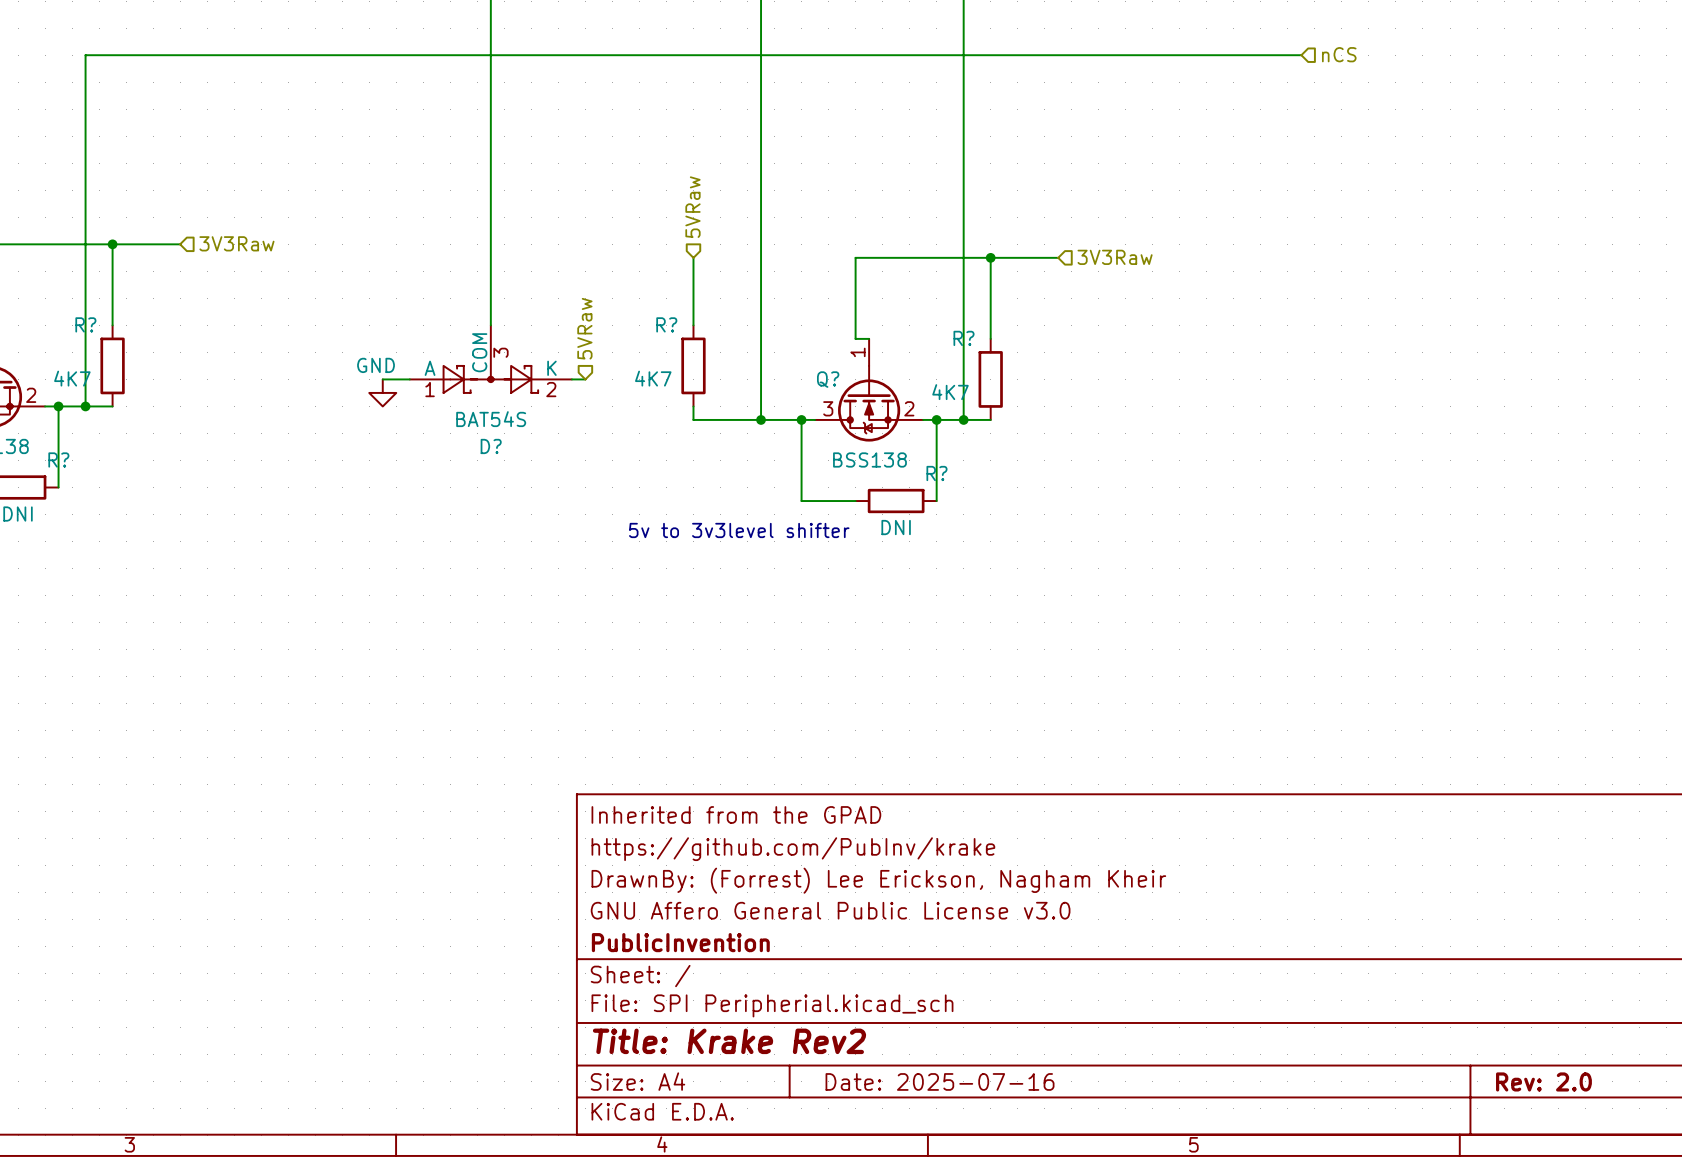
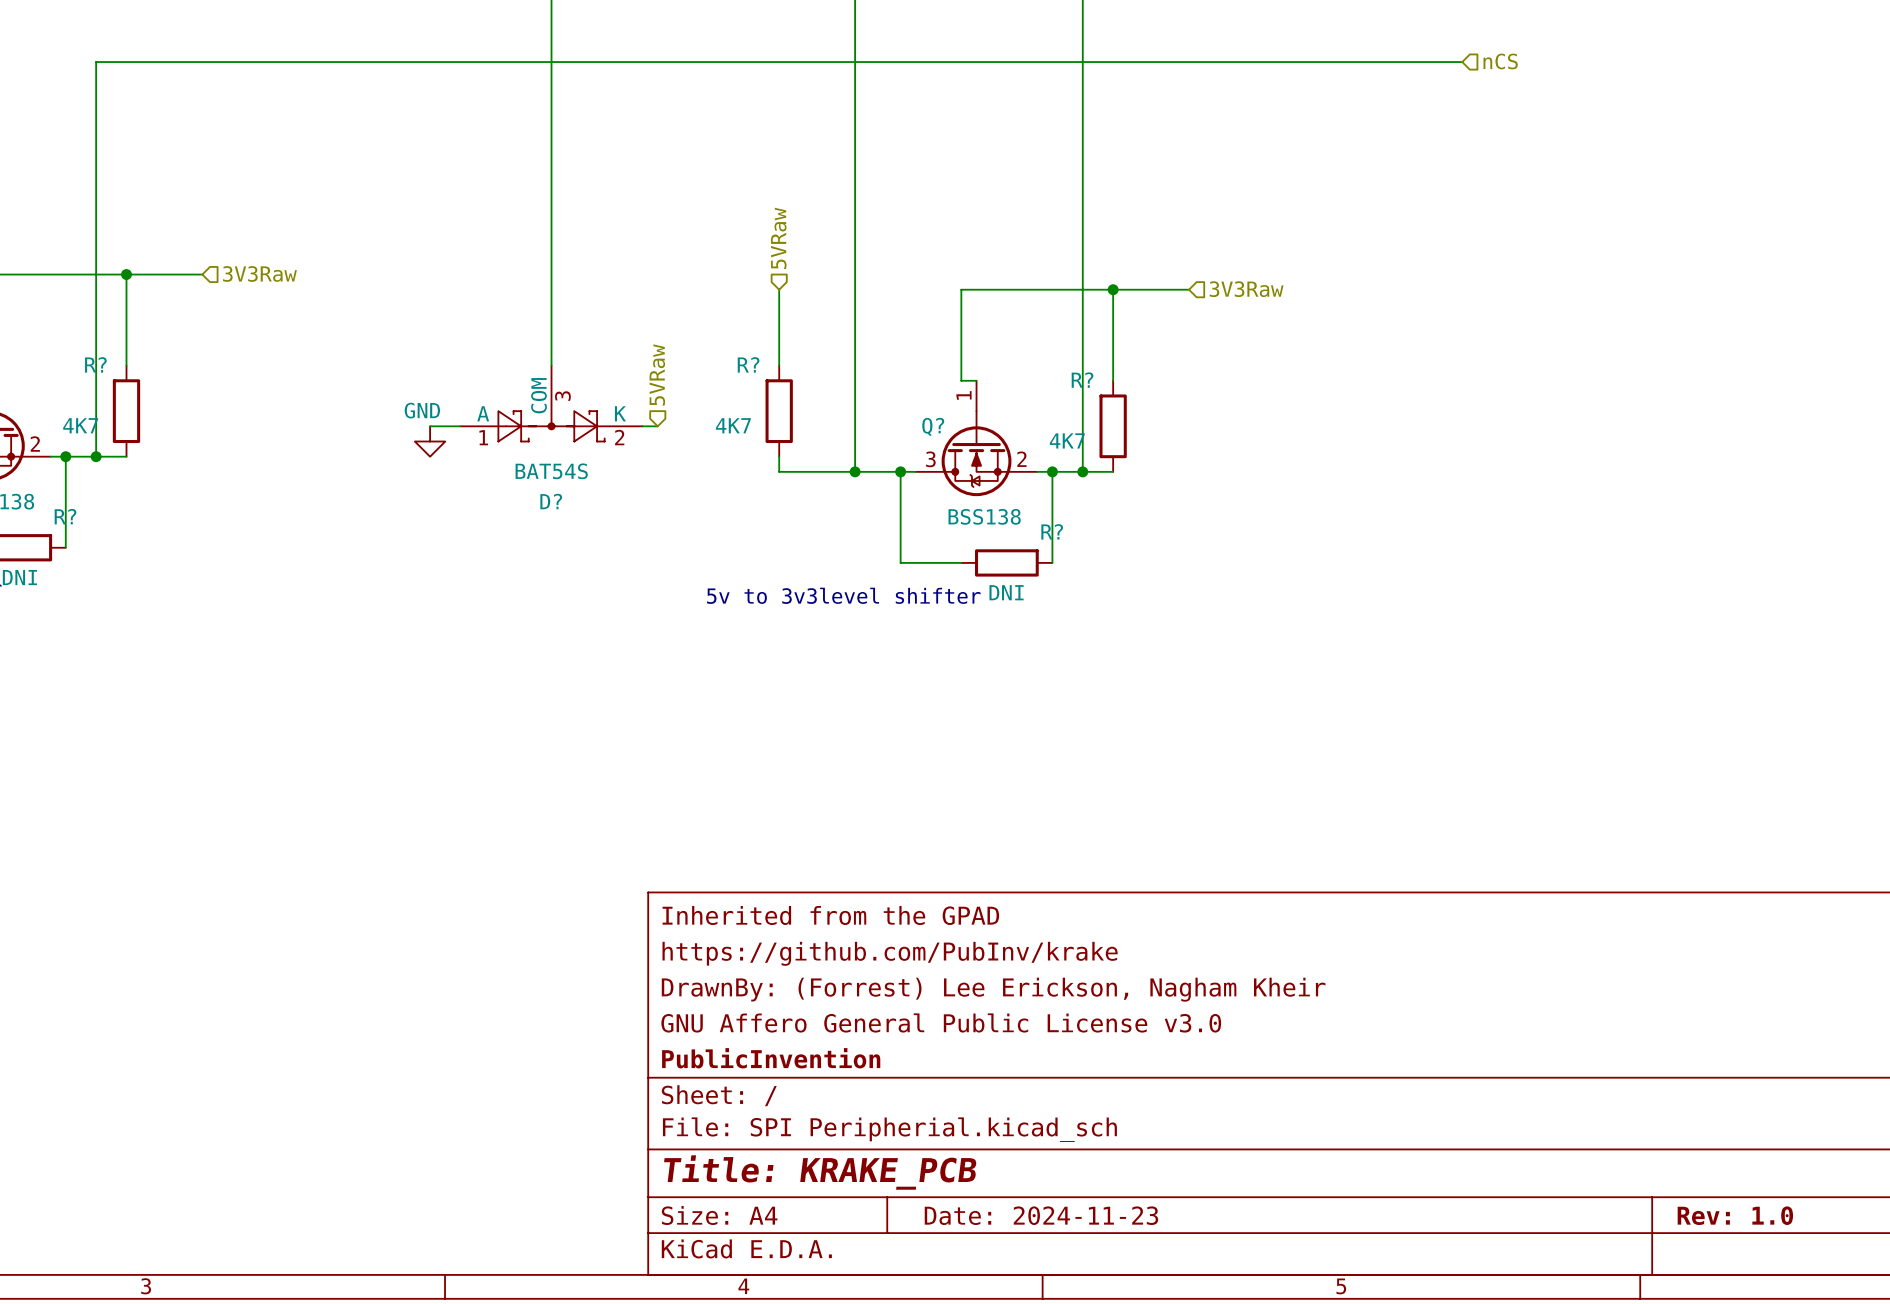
title block: Title: Krake Rev2 (729, 1041) -> Title: KRAKE_PCB (820, 1172)
title block: Date: 2025-07-16 (940, 1081) -> Date: 2024-11-23 (1041, 1215)
title block: Rev: 2.0 (1543, 1081) -> Rev: 1.0 (1735, 1215)

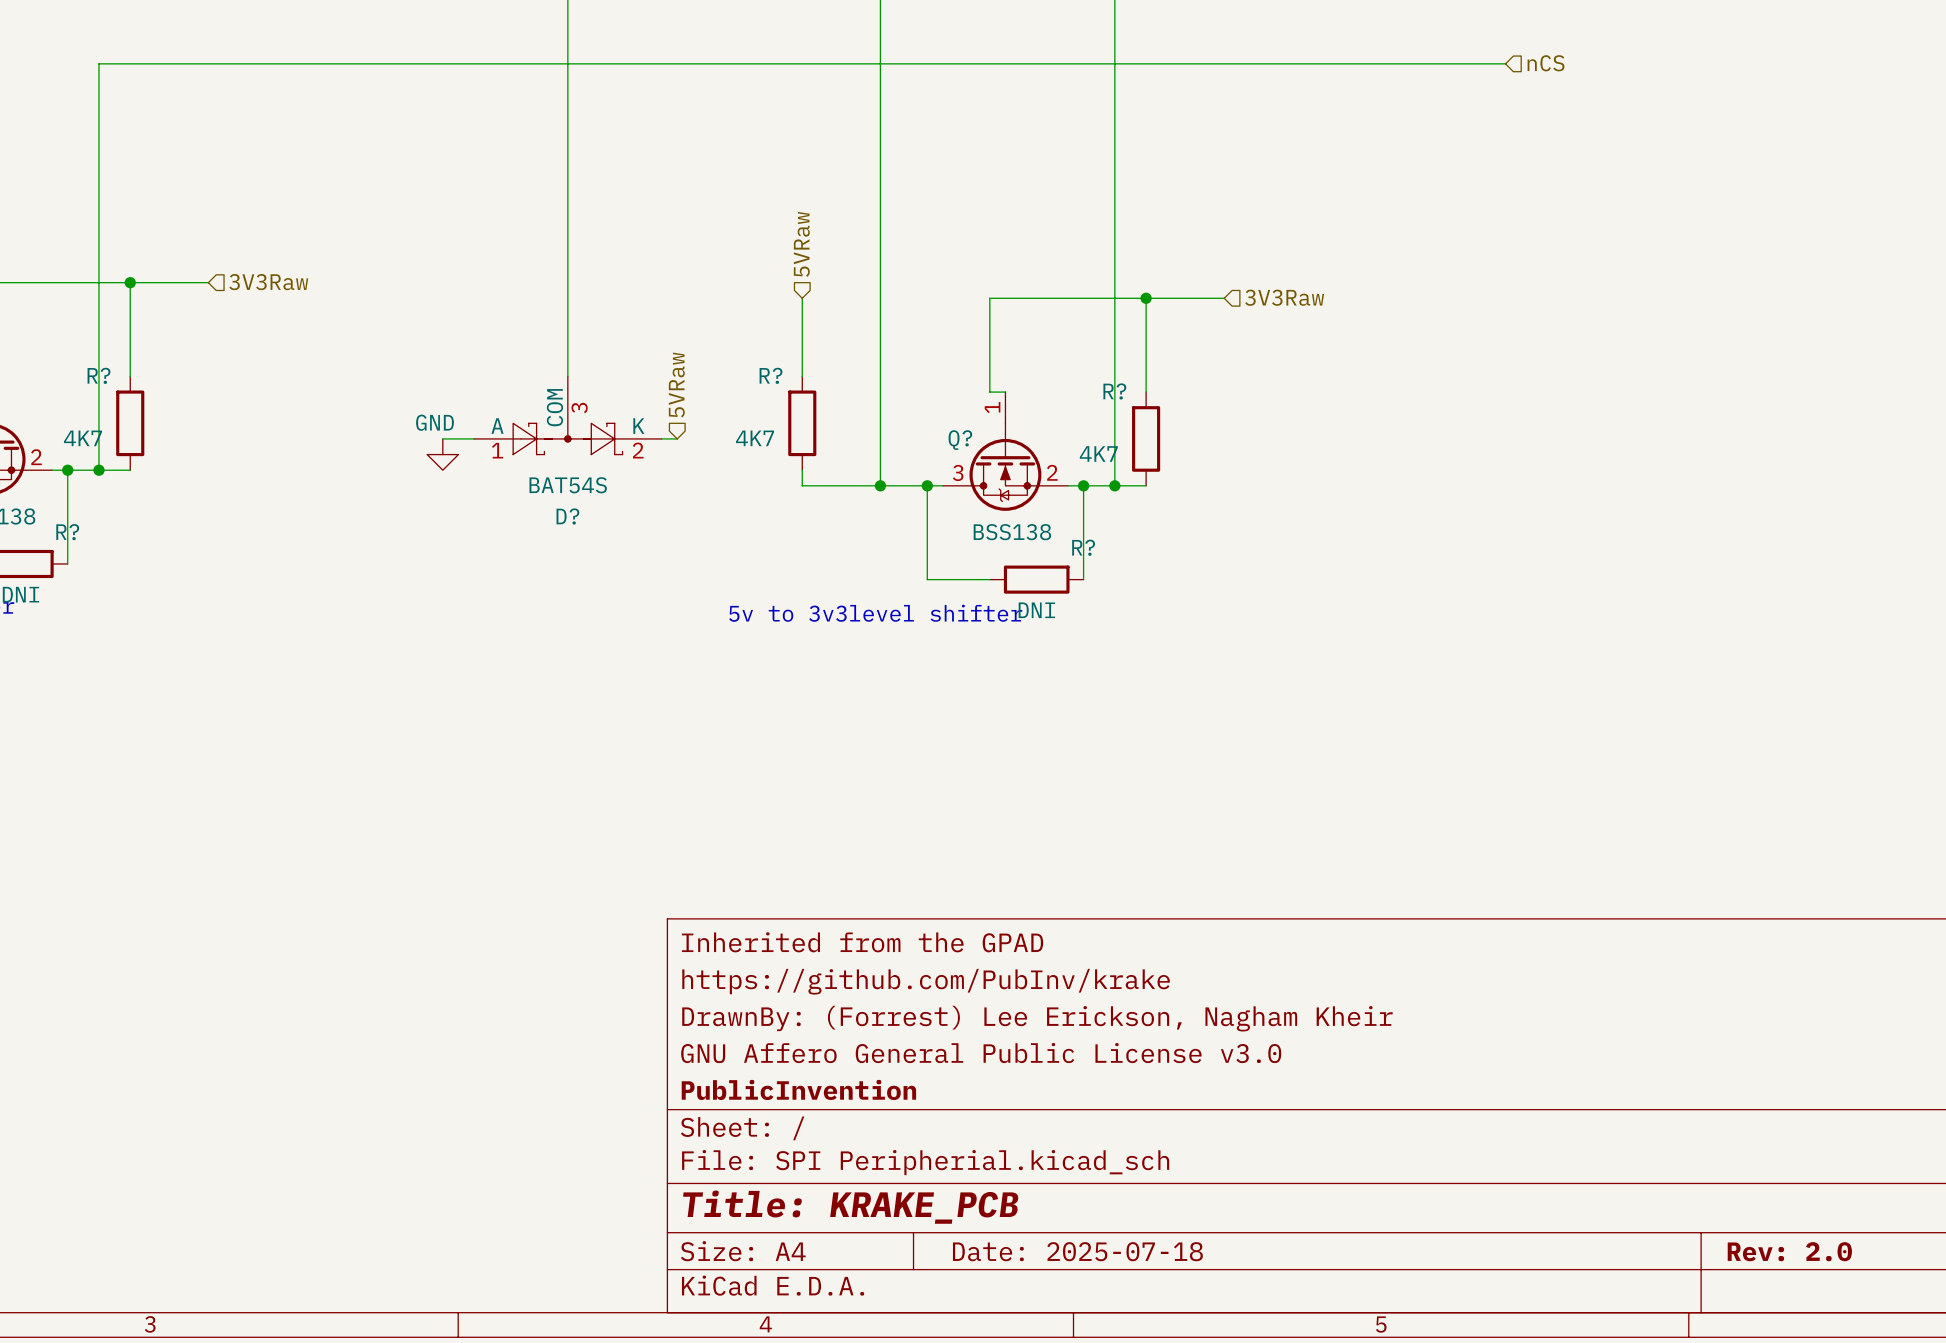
title block: Date: 2024-11-23 (1041, 1215) -> Date: 2025-07-18 (1077, 1251)
title block: Rev: 1.0 (1735, 1215) -> Rev: 2.0 (1789, 1251)

